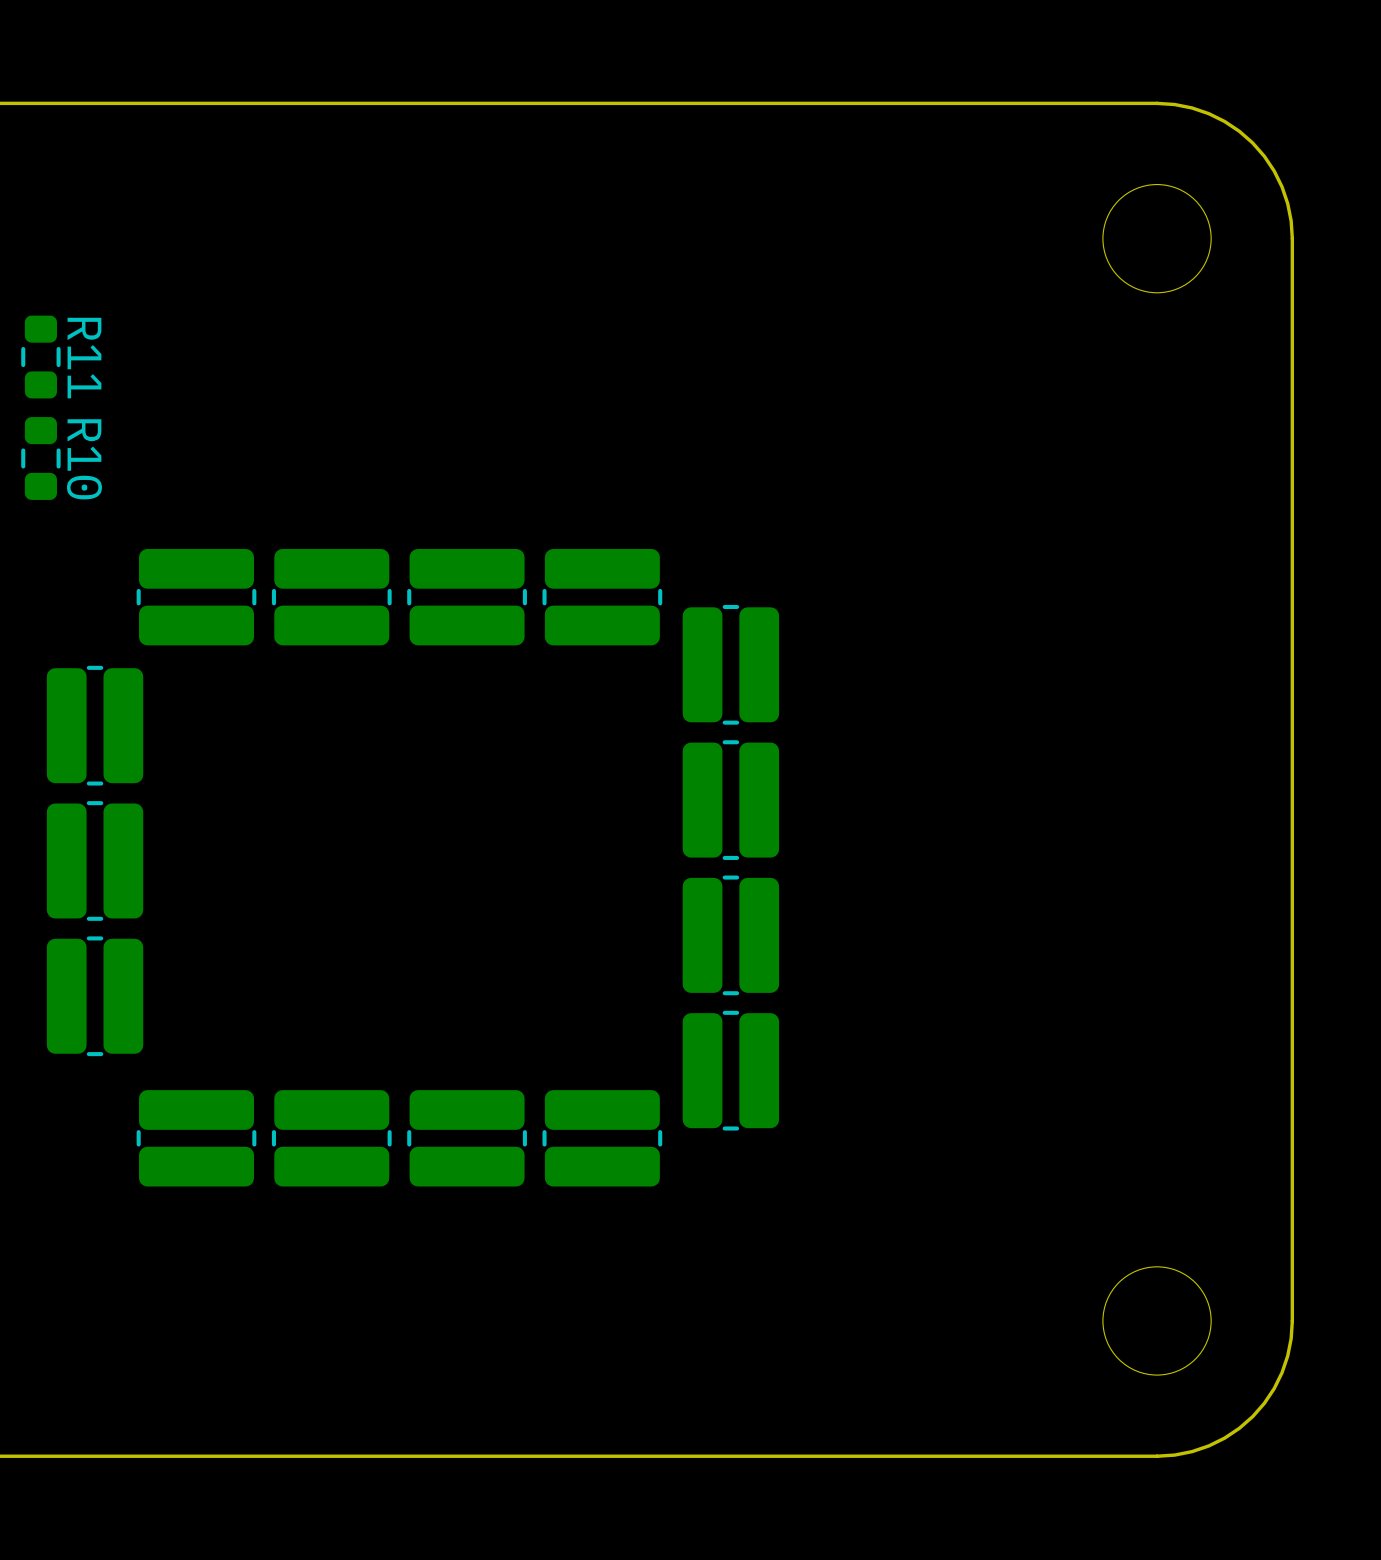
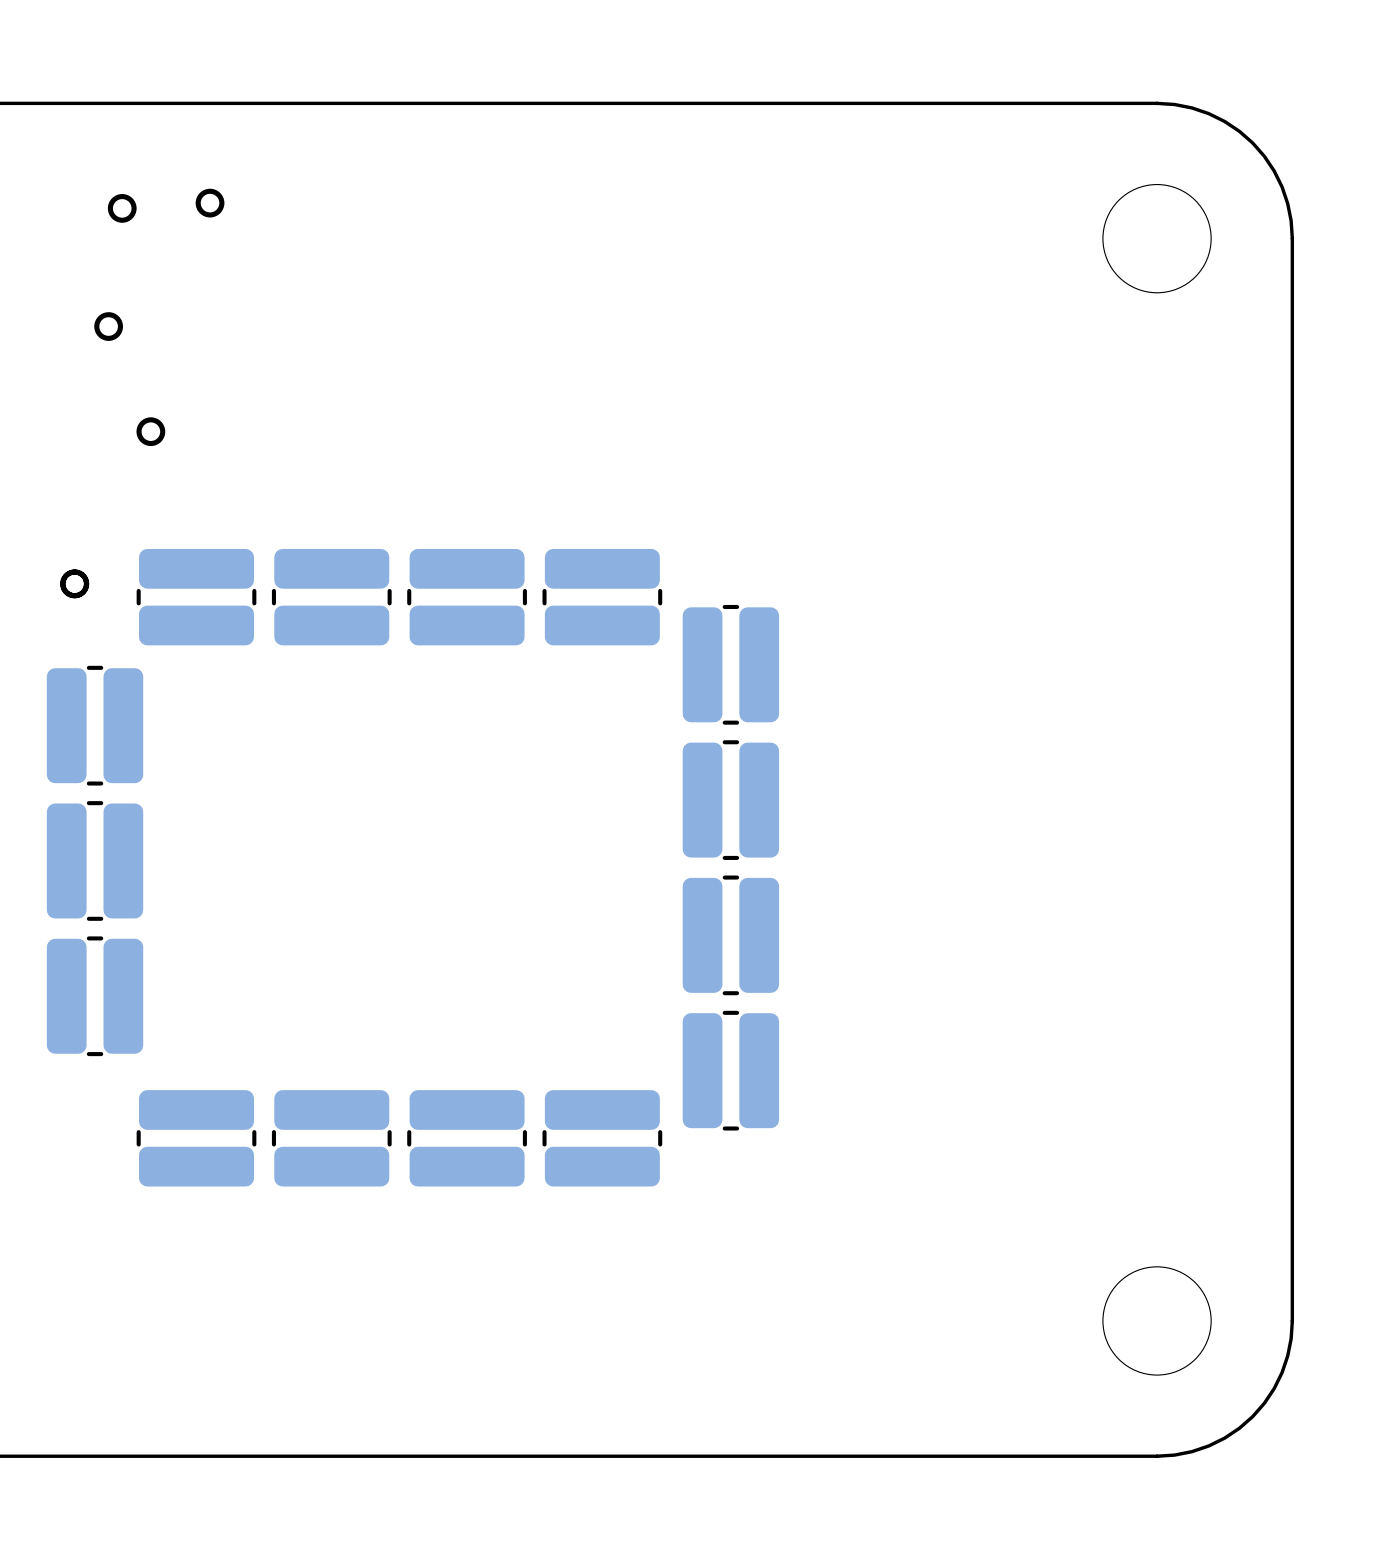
drawing: none -> [195, 188, 225, 218]
drawing: none -> [107, 194, 137, 223]
drawing: none -> [94, 312, 124, 341]
R11: (40, 357) -> none
drawing: none -> [136, 417, 166, 447]
R10: (40, 458) -> none
drawing: none -> [60, 569, 90, 599]

